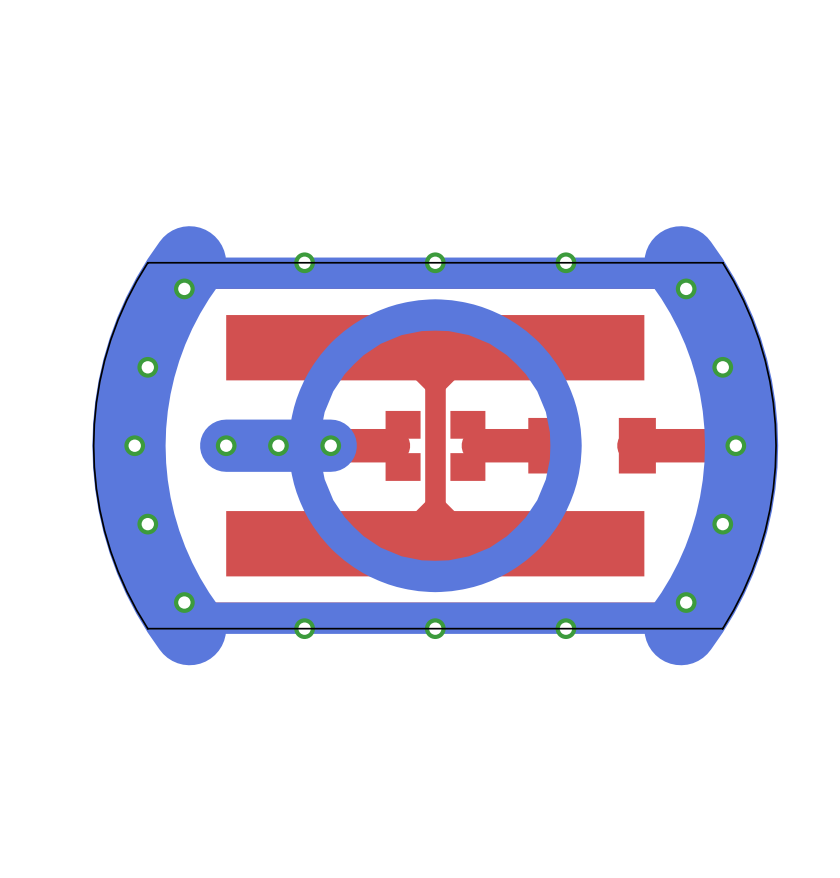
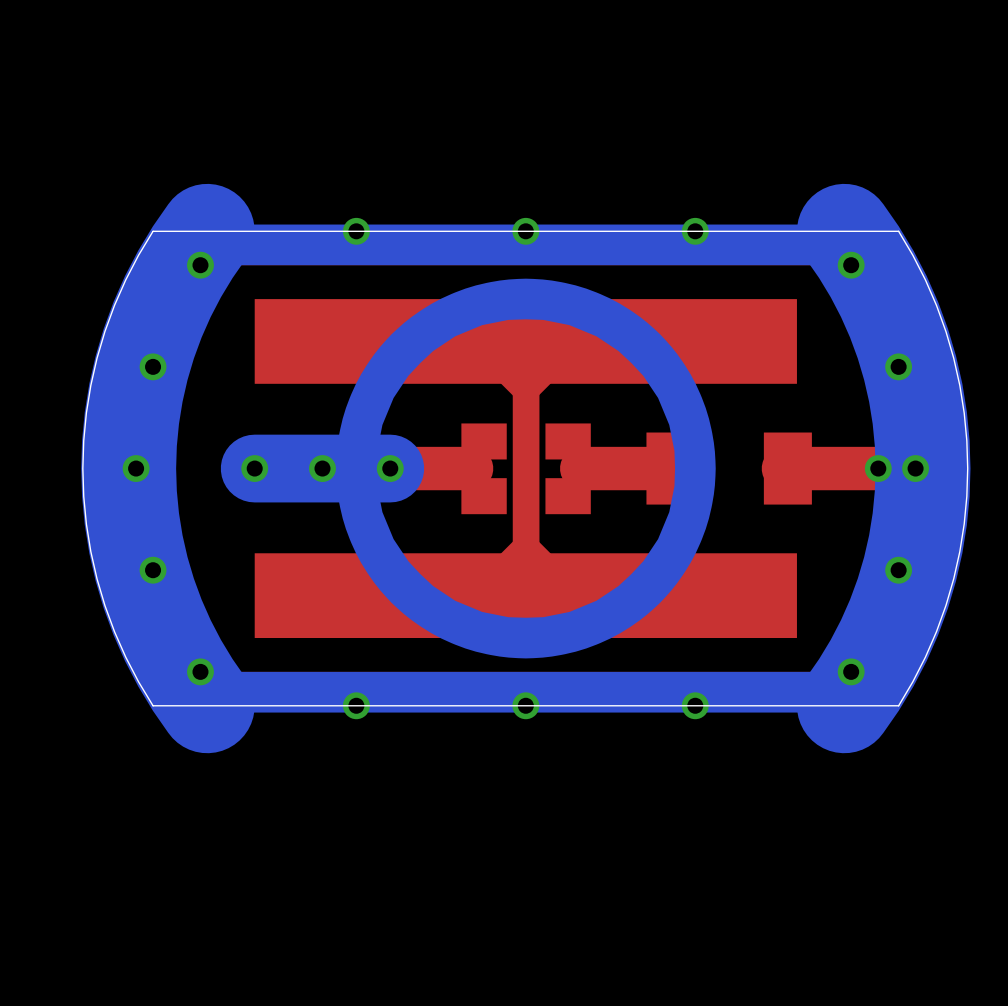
via: none -> (878, 468)

